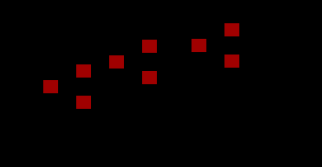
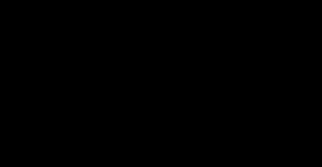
part: (215, 45) -> none
part: (133, 61) -> none
part: (67, 86) -> none

